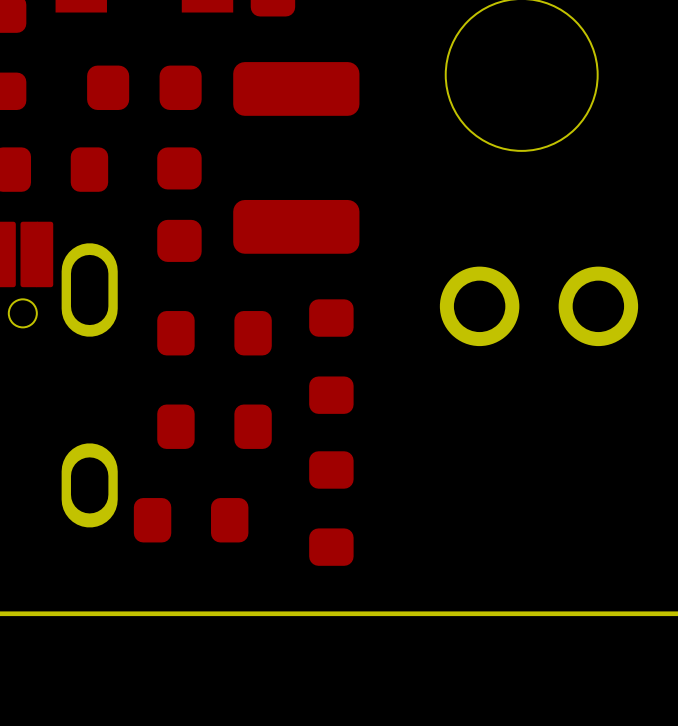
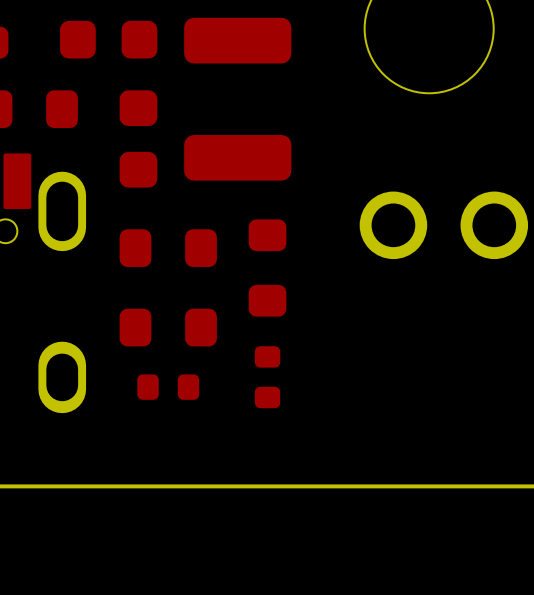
part footprint: [309, 451, 354, 566] -> [254, 346, 281, 409]
part footprint: [133, 498, 249, 543] -> [137, 374, 200, 400]

